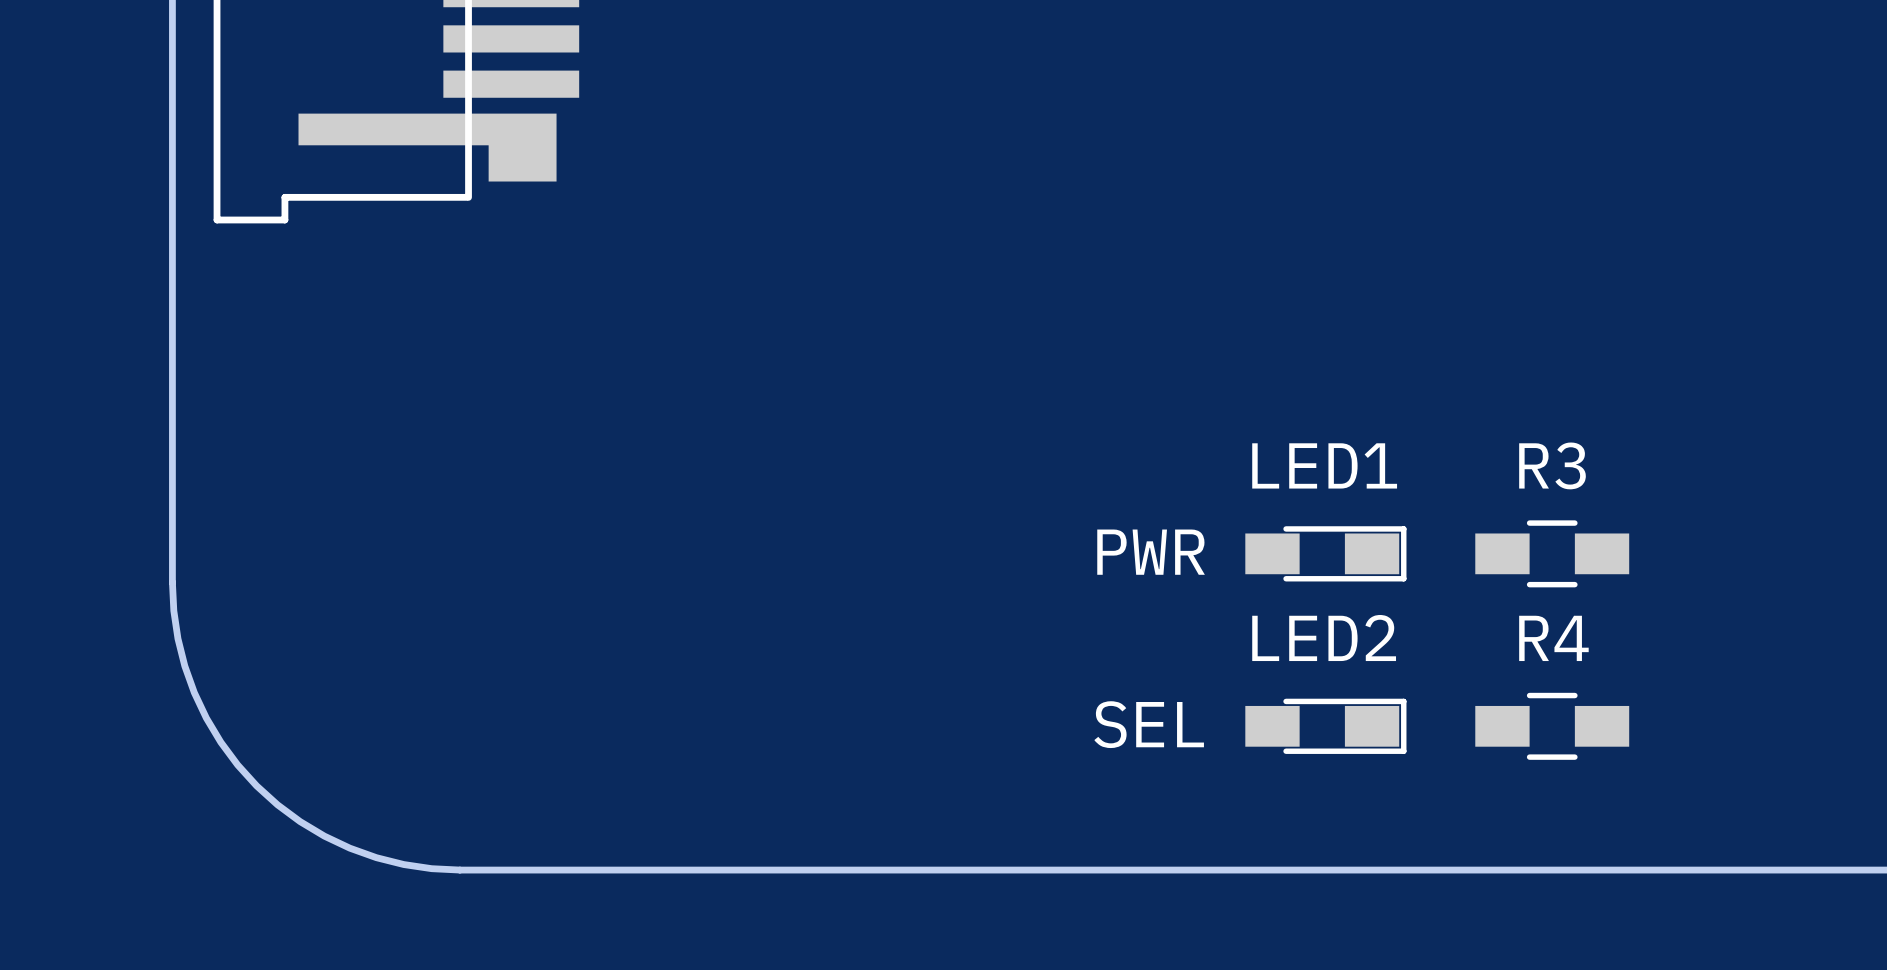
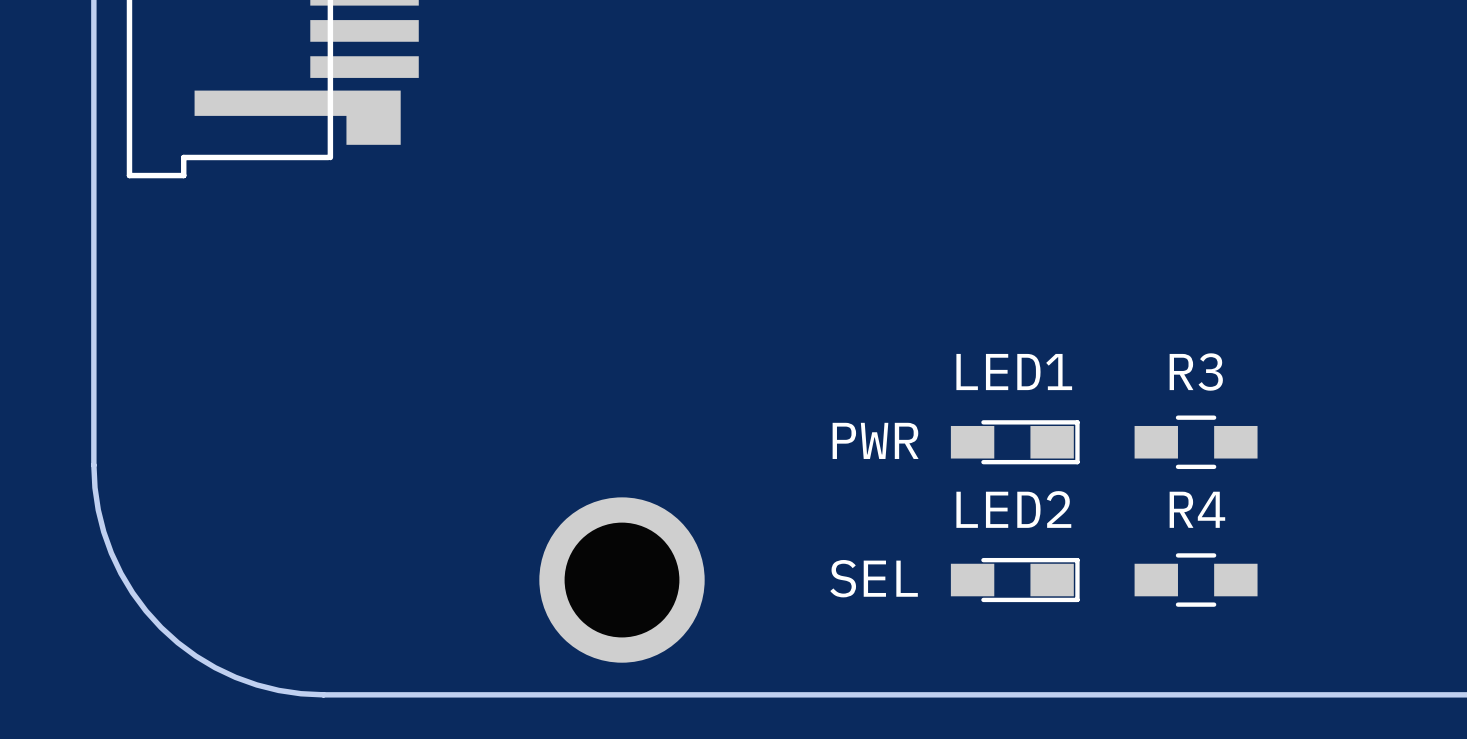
part: none -> (622, 580)

